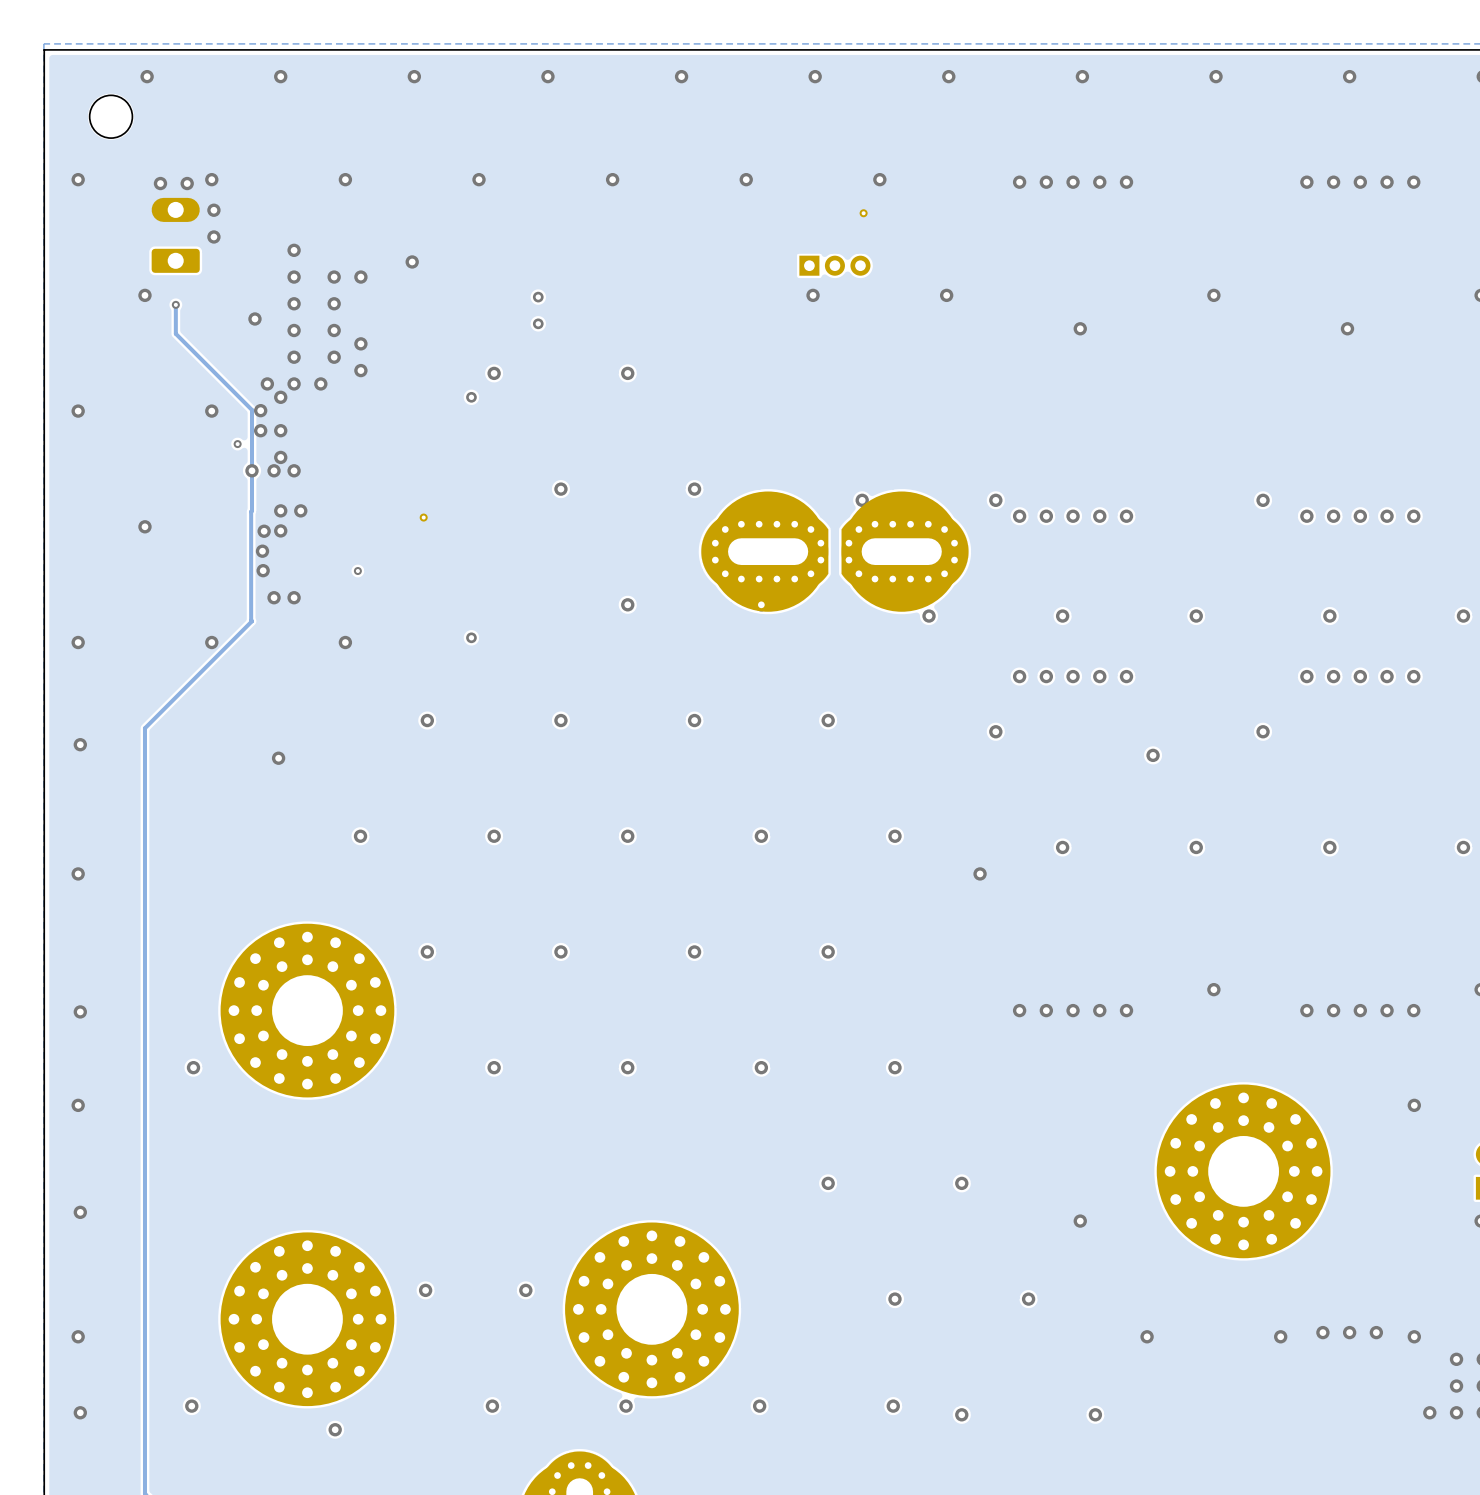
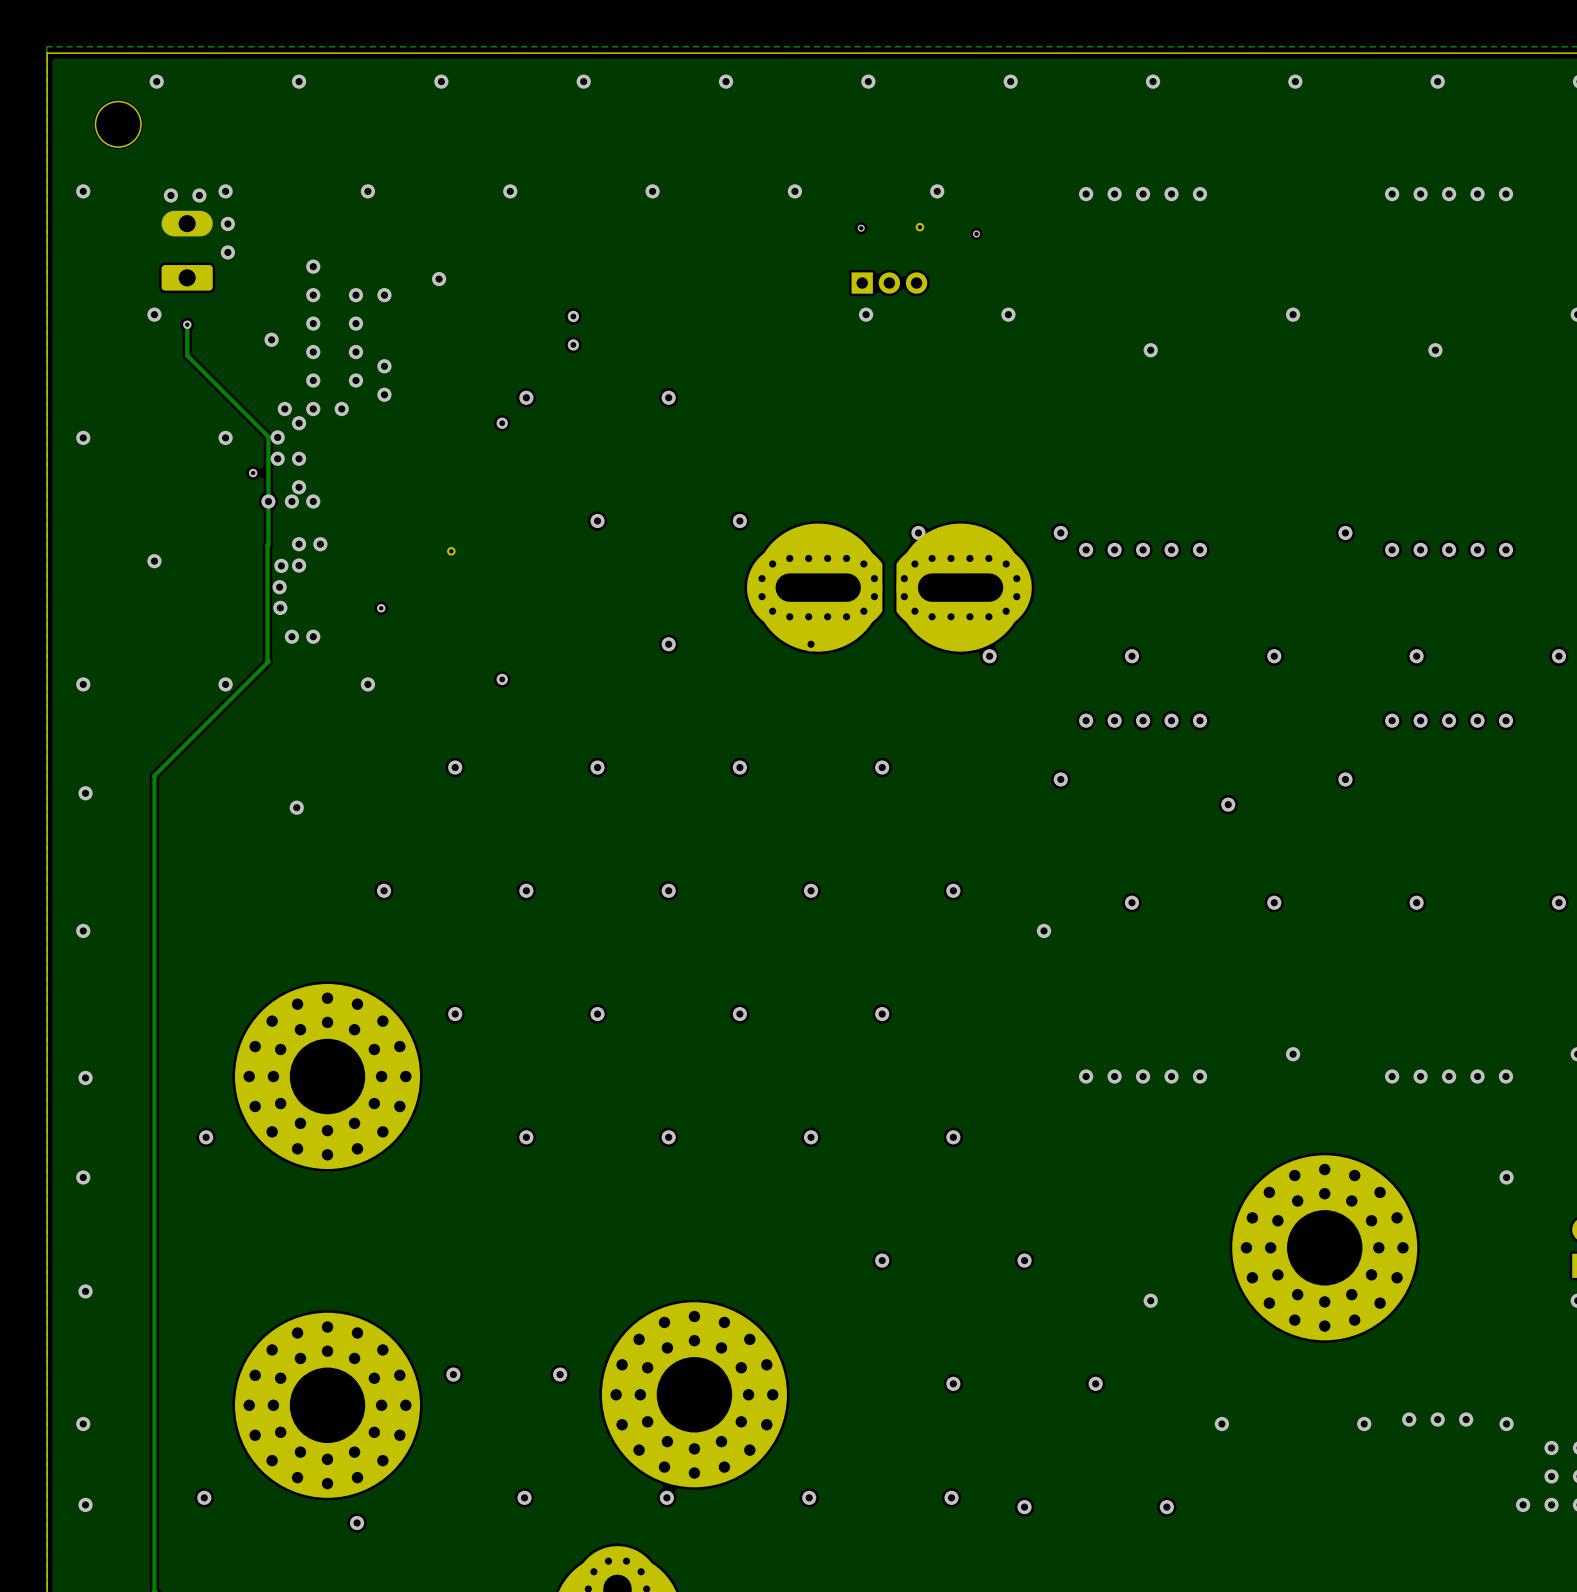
via: none -> (861, 228)
via: none -> (976, 233)

